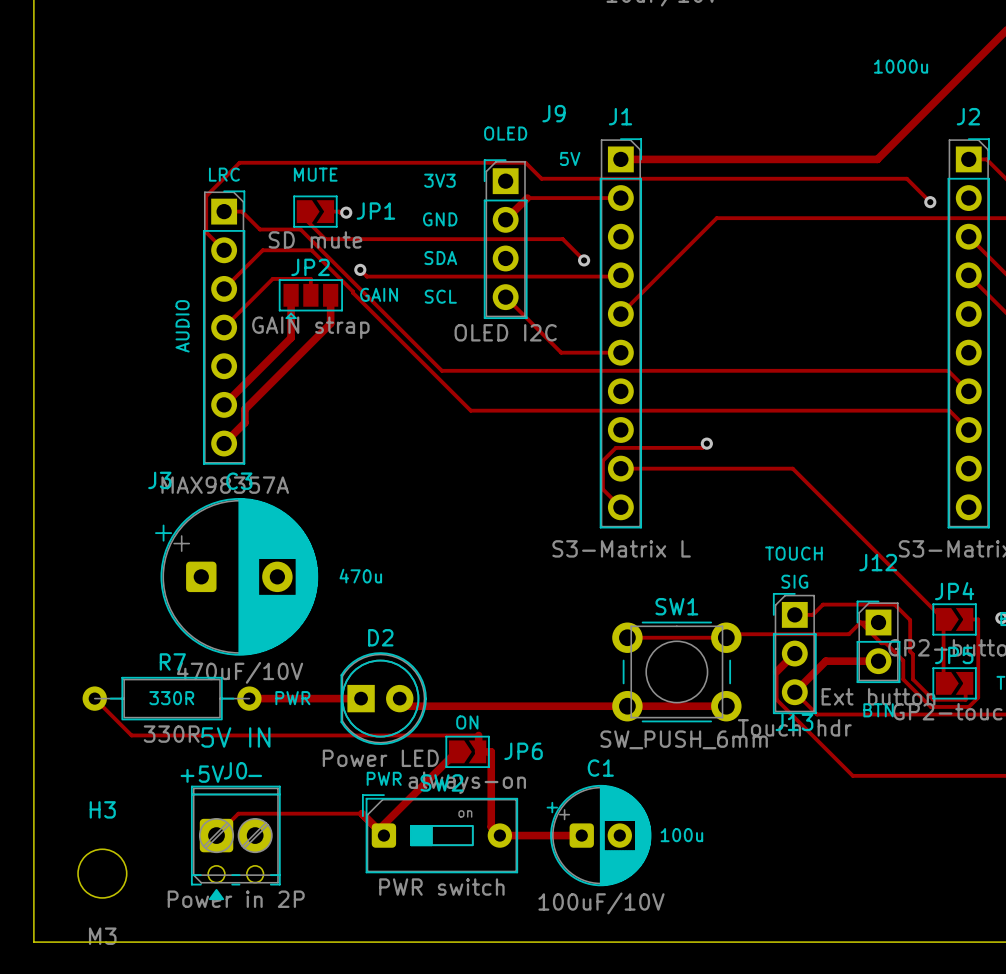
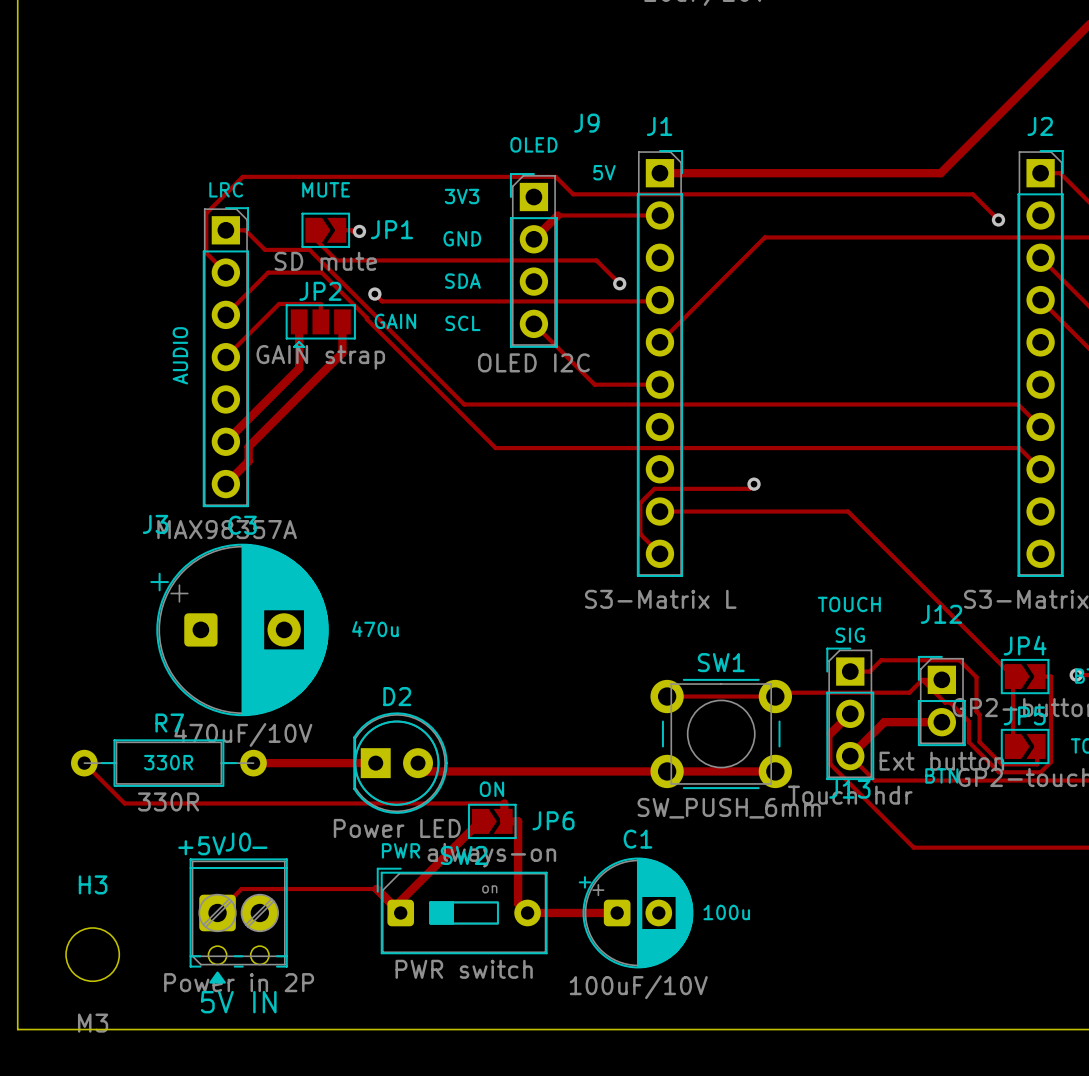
text: 1000u (901, 66) -> none
text: PWR (292, 698) -> none
text position: 5V IN (235, 737) -> 5V IN (238, 1002)

